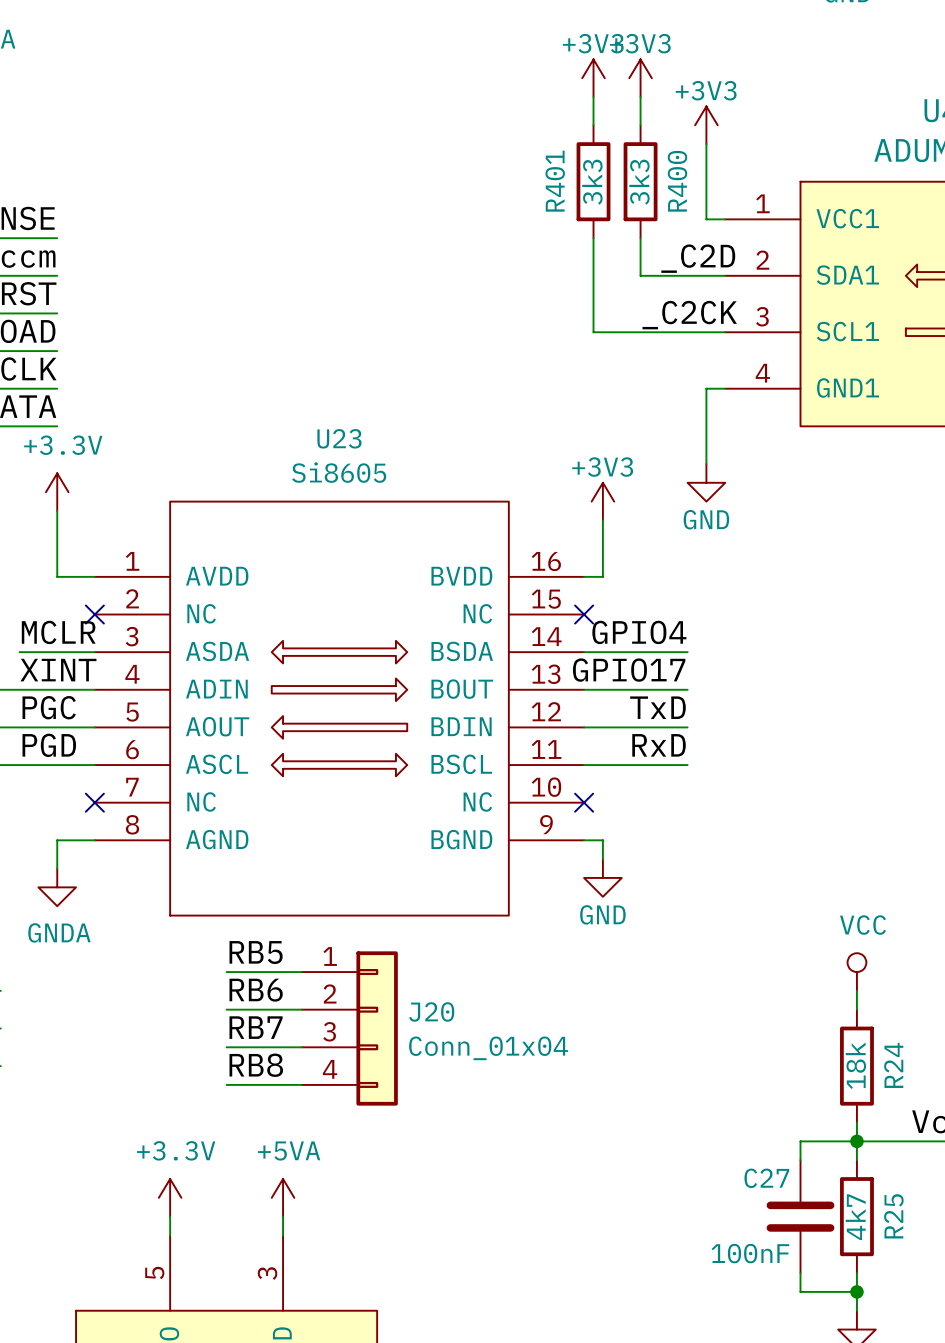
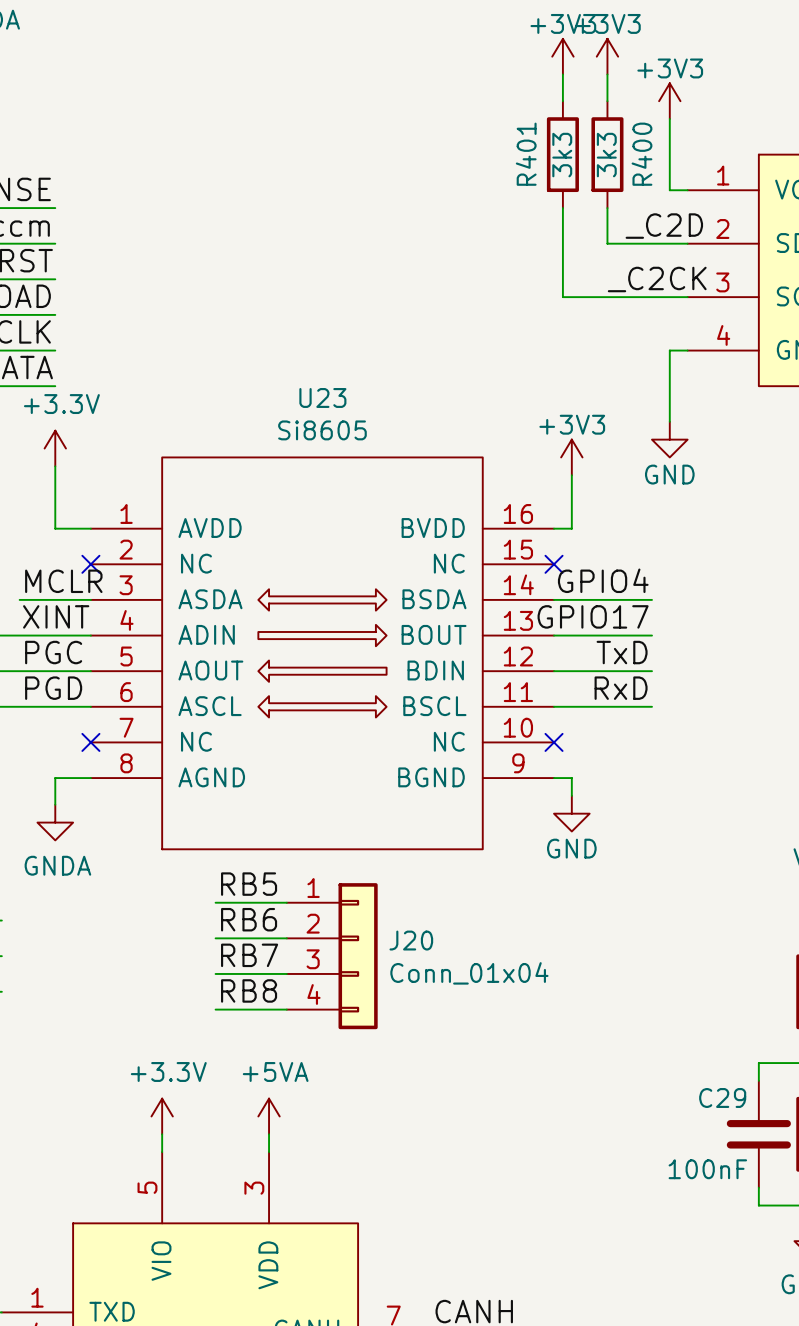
C27 name: C27 (766, 1178) -> C29 (722, 1098)

